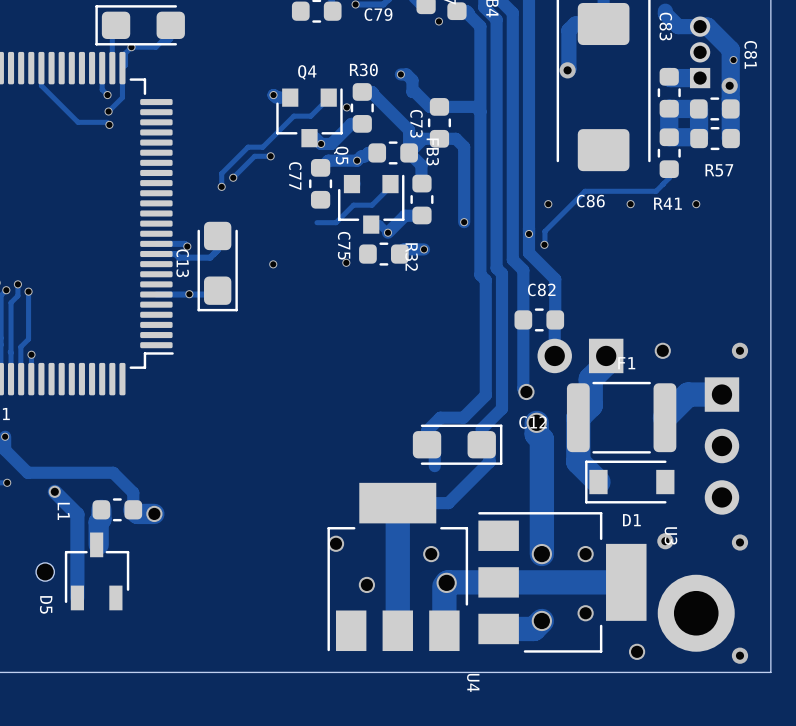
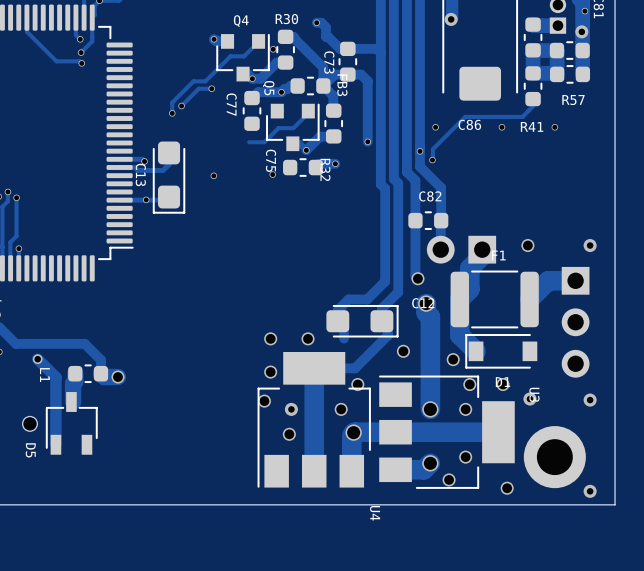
via: none -> (270, 338)
via: none -> (308, 338)
via: none -> (403, 351)
via: none -> (453, 359)
via: none -> (270, 372)
via: none -> (357, 384)
via: none -> (469, 384)
via: none -> (503, 384)
via: none -> (291, 409)
via: none -> (449, 479)

